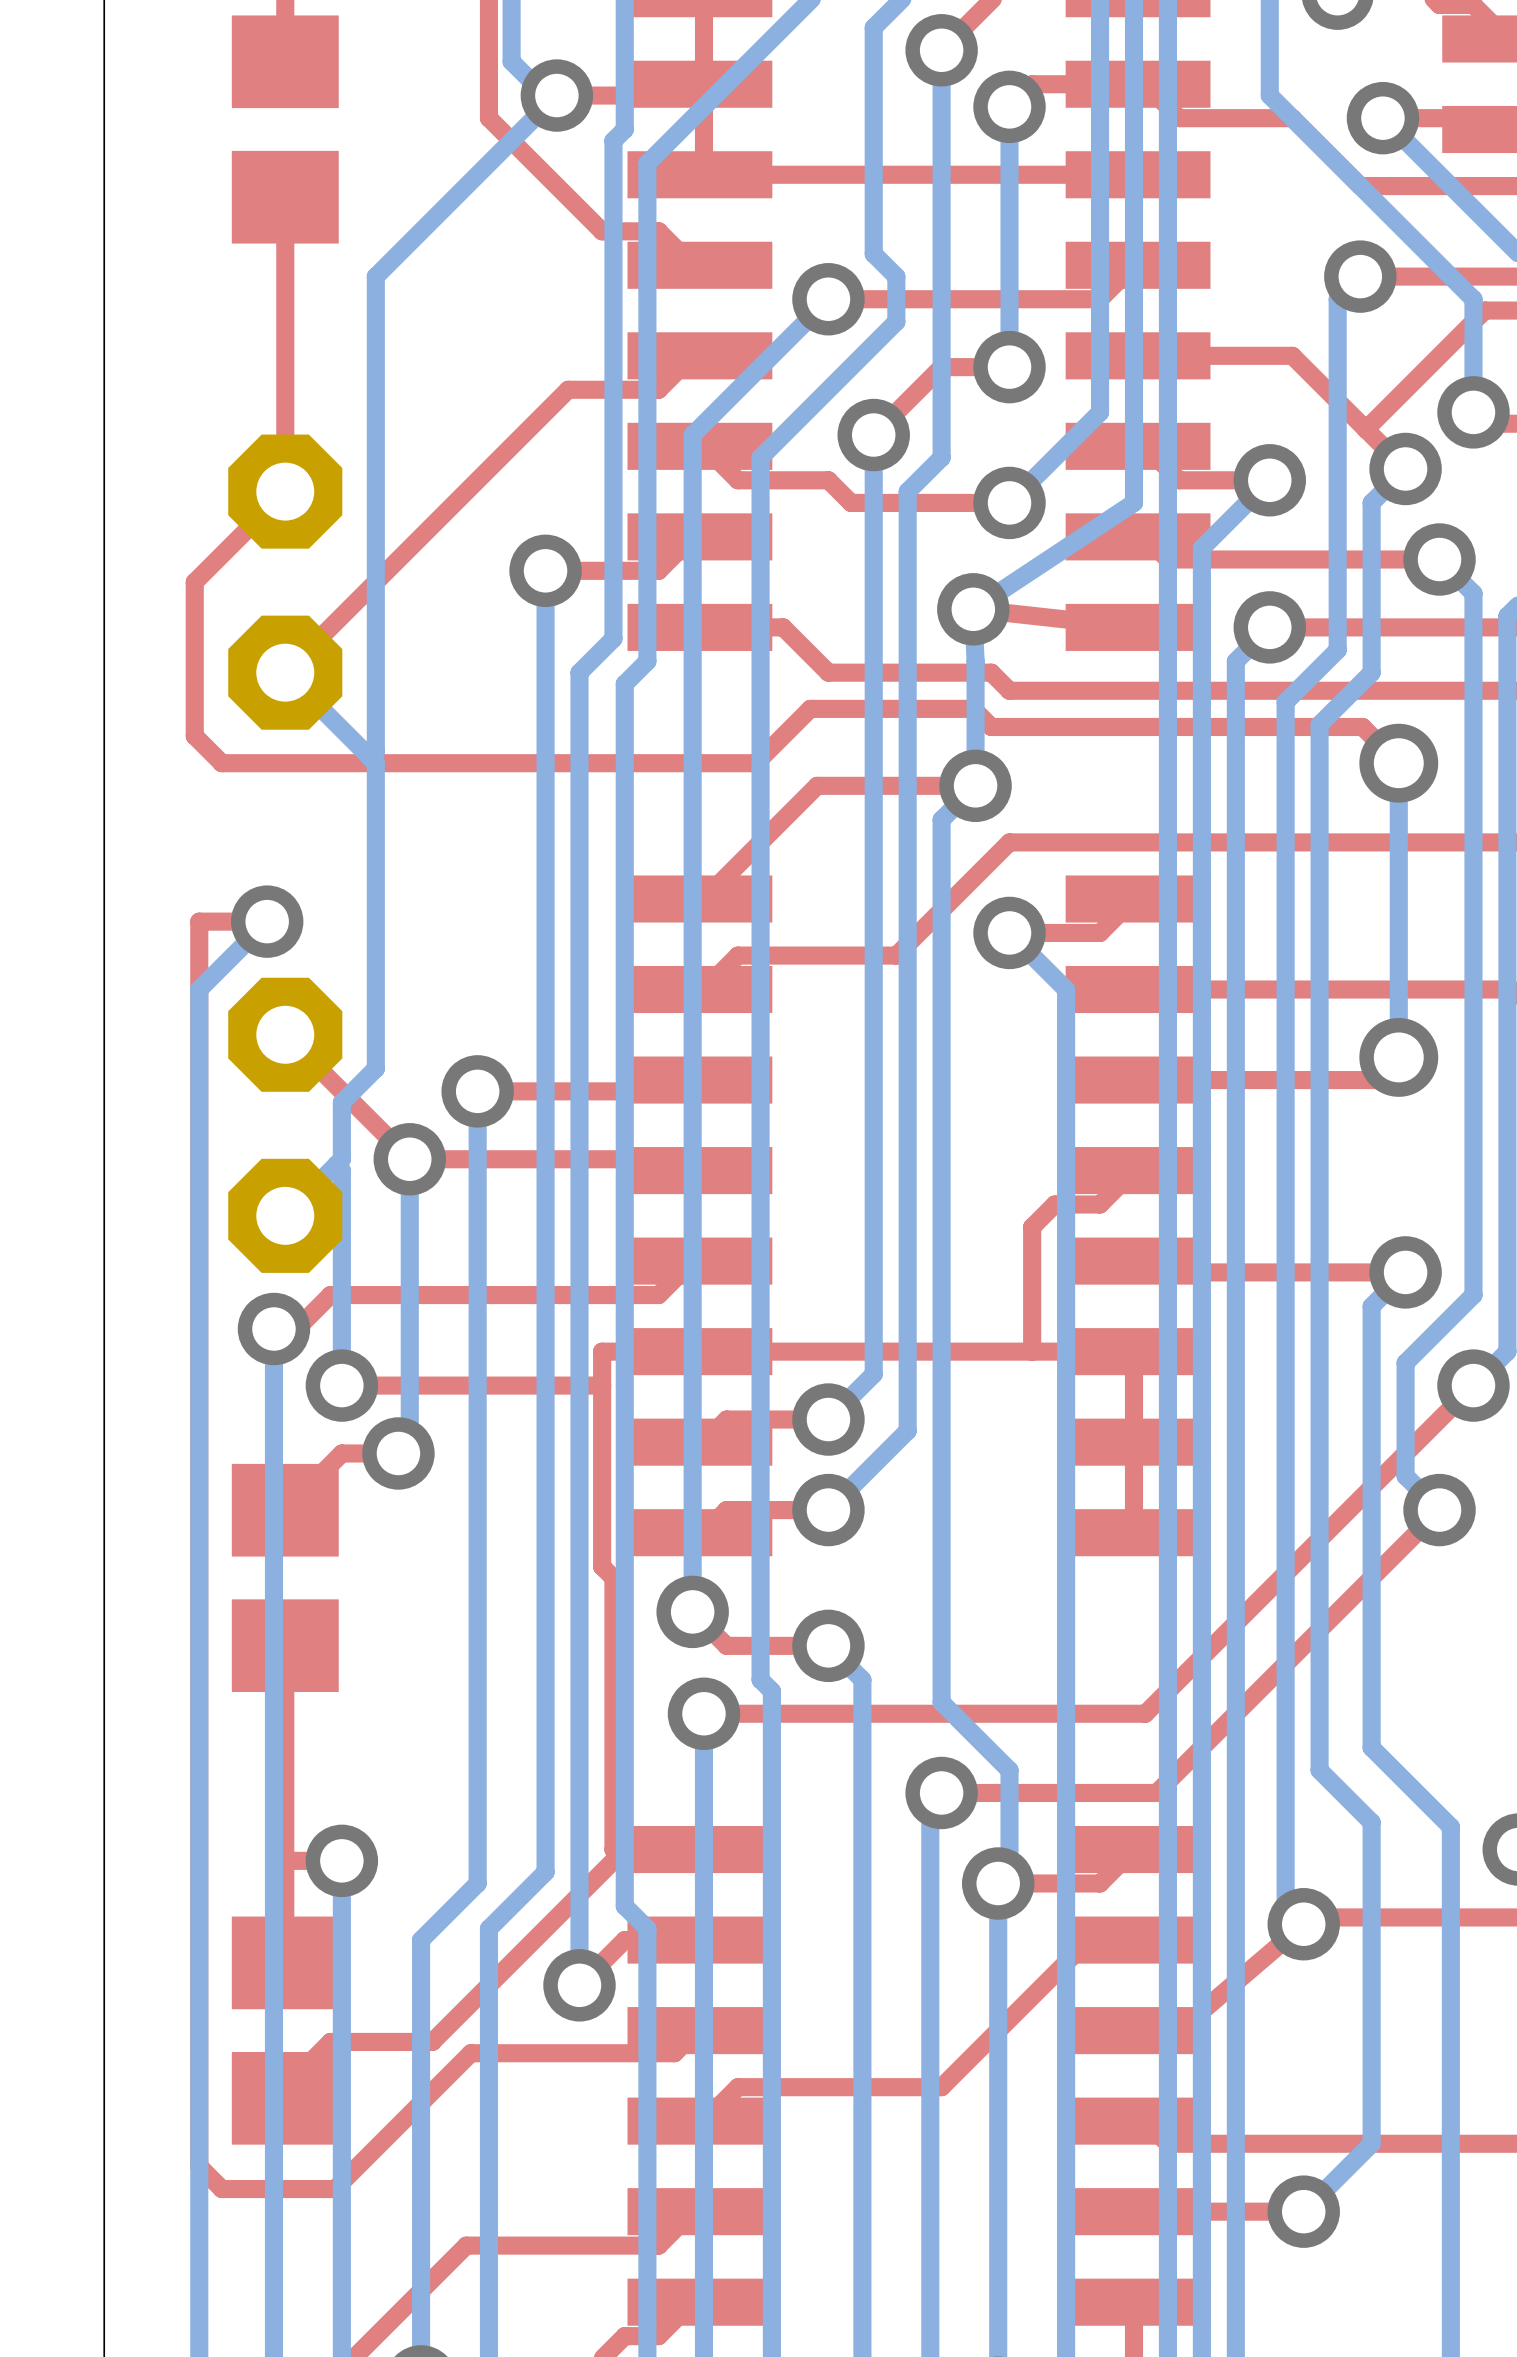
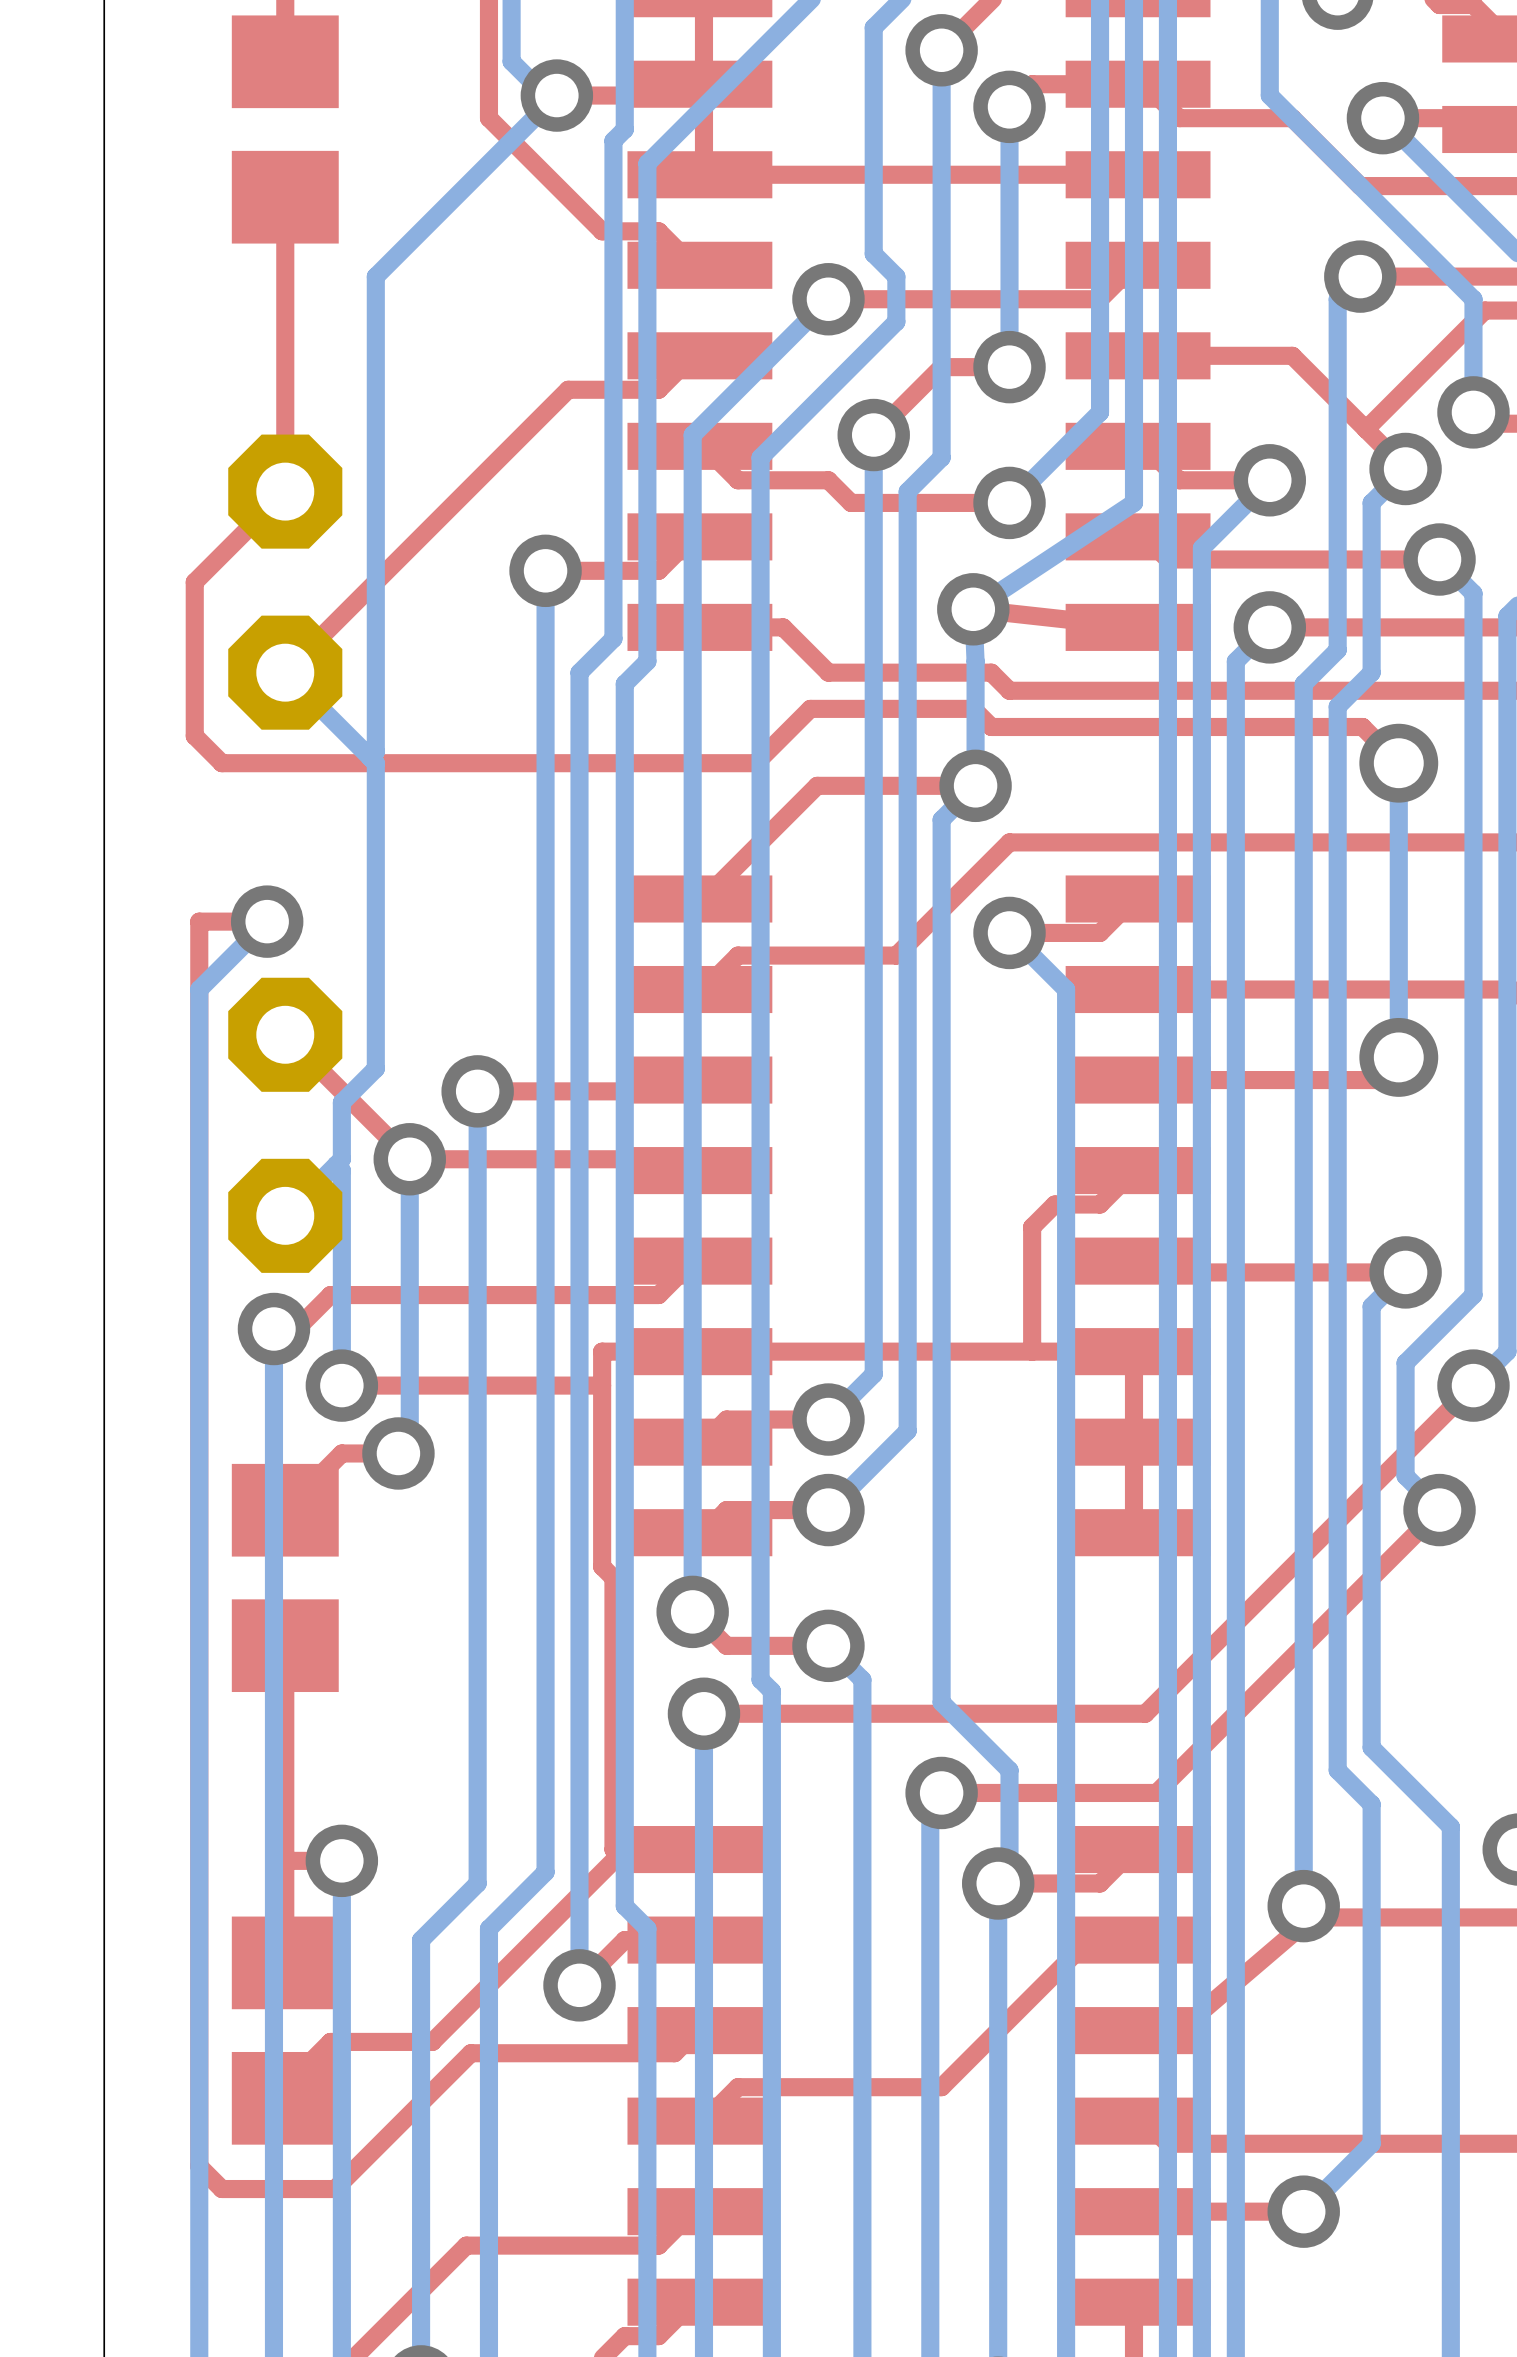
bottom track: (1303, 683) (1285, 702) (1285, 1906) (1303, 1924) -> (1303, 683) (1303, 1906)
bottom track: (1337, 706) (1319, 724) (1319, 1770) (1371, 1822) -> (1337, 706) (1337, 1770) (1371, 1804) (1371, 1822)
via position: (1303, 1924) -> (1303, 1906)

